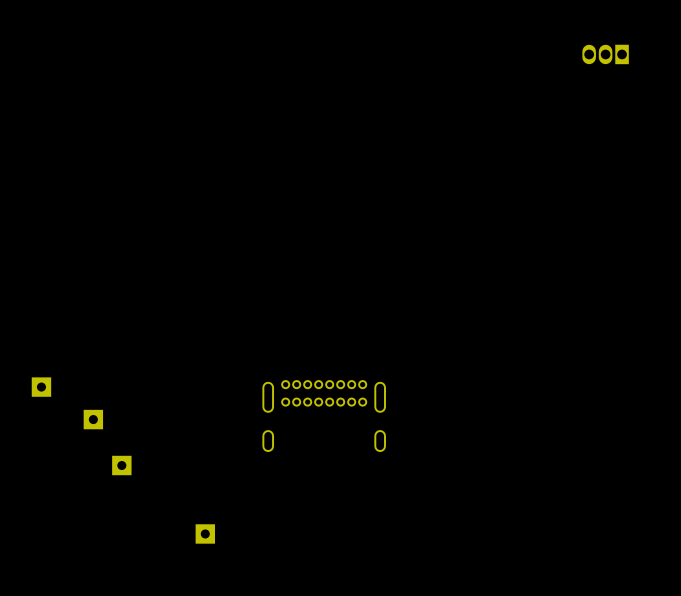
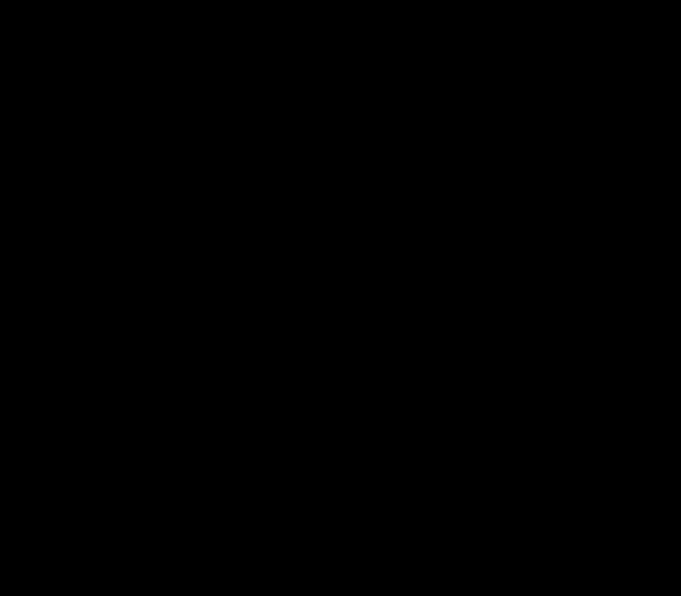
part: (605, 54) -> none
part: (41, 387) -> none
part: (324, 416) -> none
part: (93, 419) -> none
part: (121, 465) -> none
part: (205, 533) -> none

